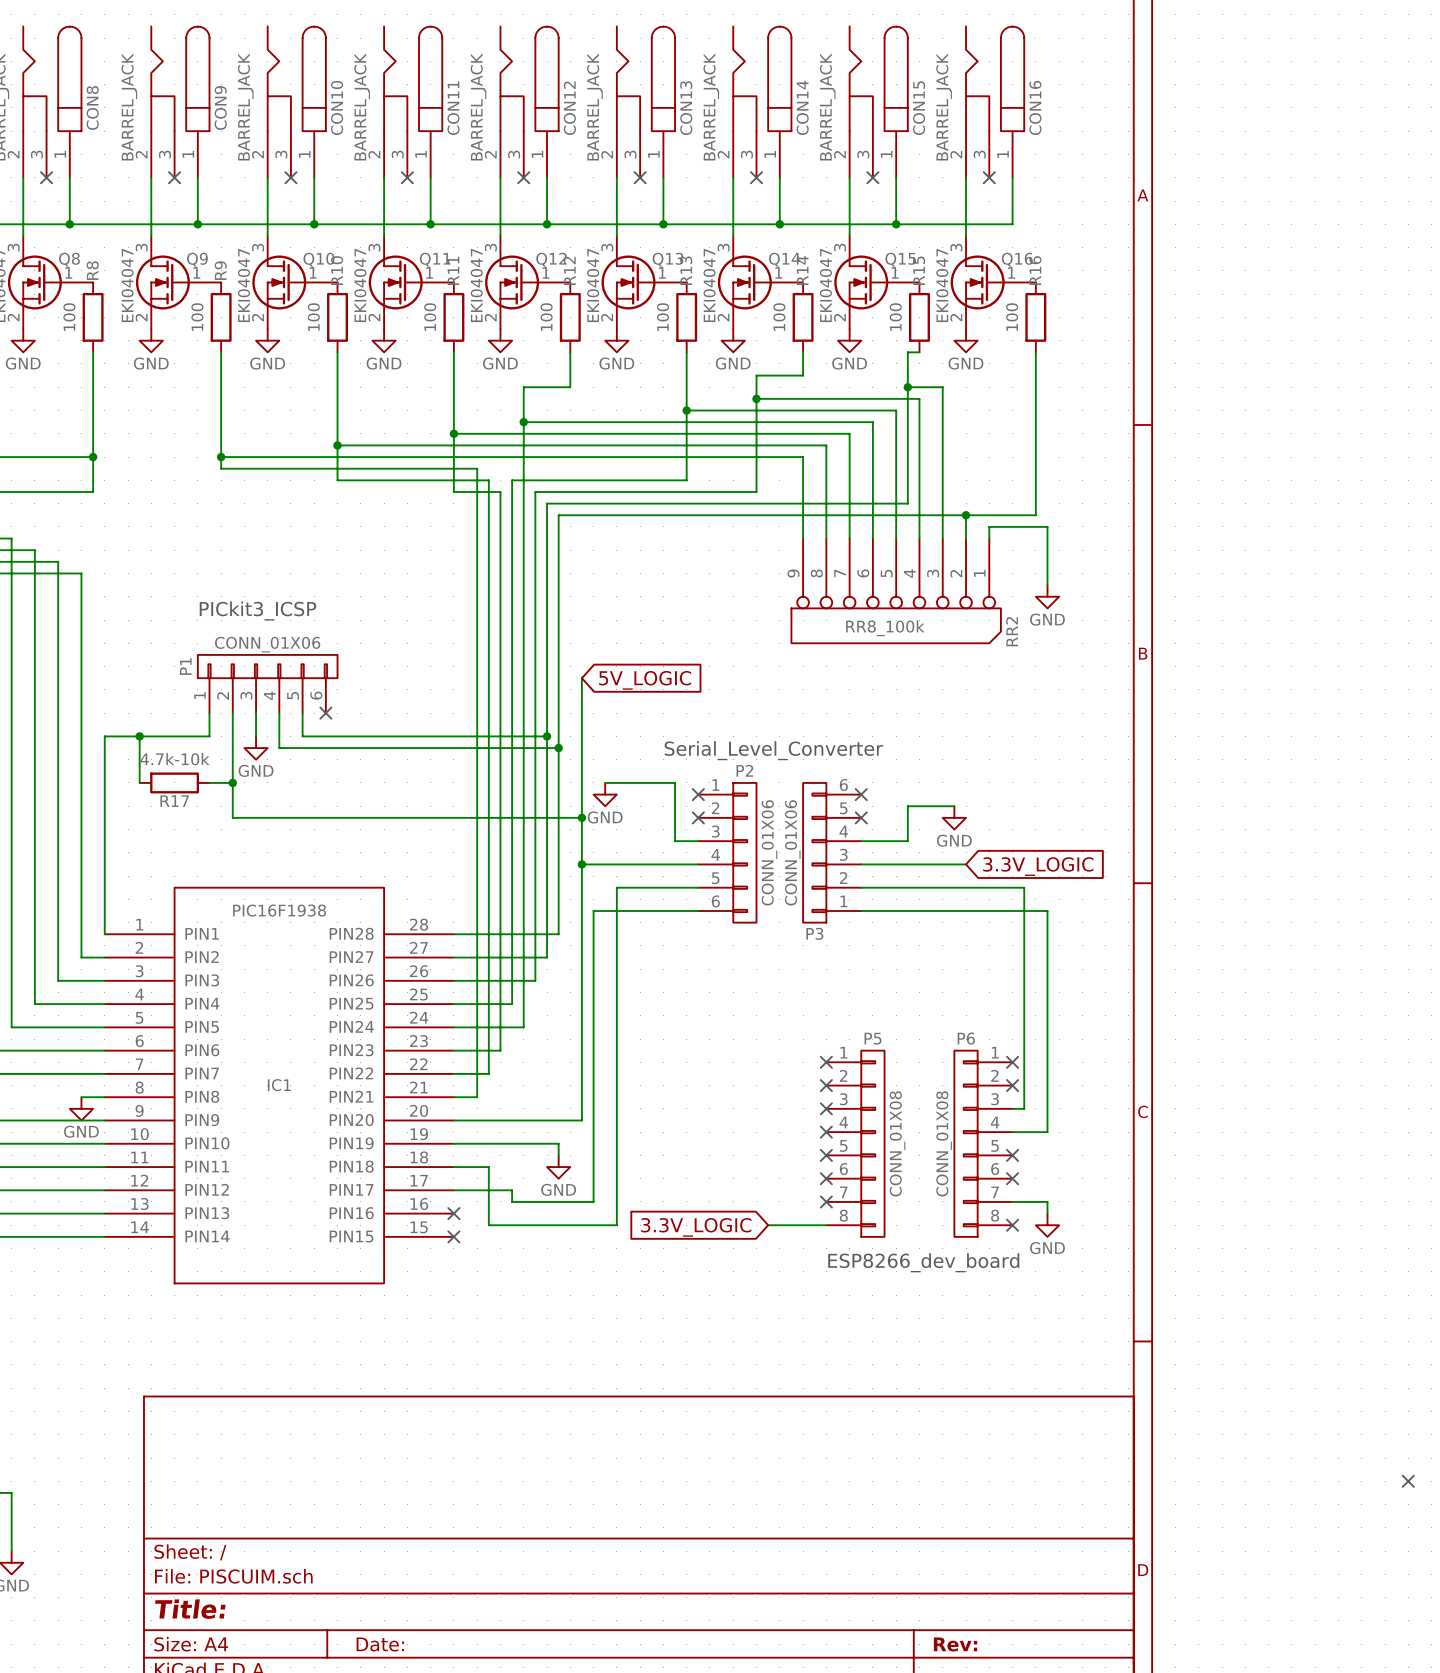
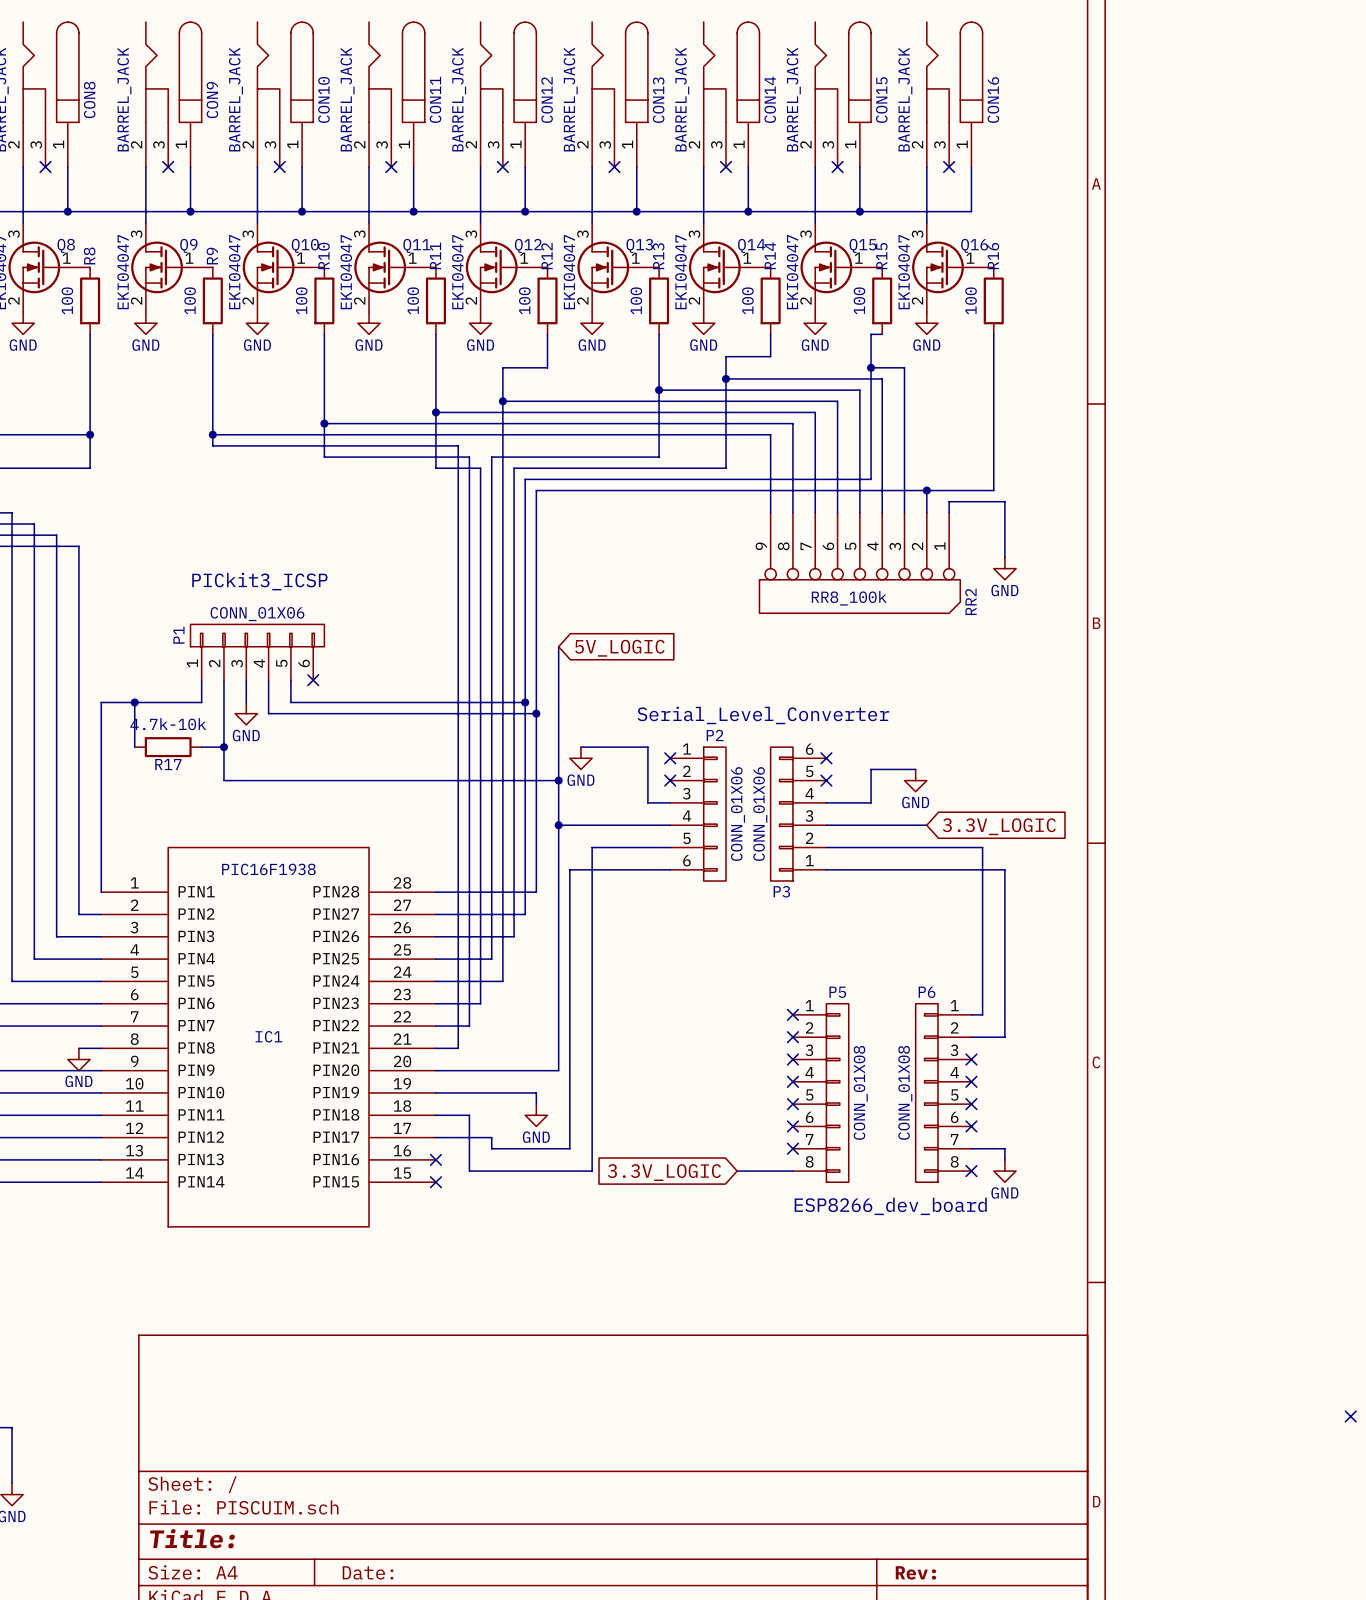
no-connect mark: (1012, 1062) -> none
wire: (1024, 1062) (1024, 1108) (1012, 1108) -> (982, 1014) (971, 1014)
no-connect mark: (1012, 1085) -> none
wire: (1047, 1085) (1047, 1132) (1012, 1132) -> (1004, 1037) (971, 1037)
no-connect mark: none -> (971, 1059)
no-connect mark: none -> (971, 1081)

